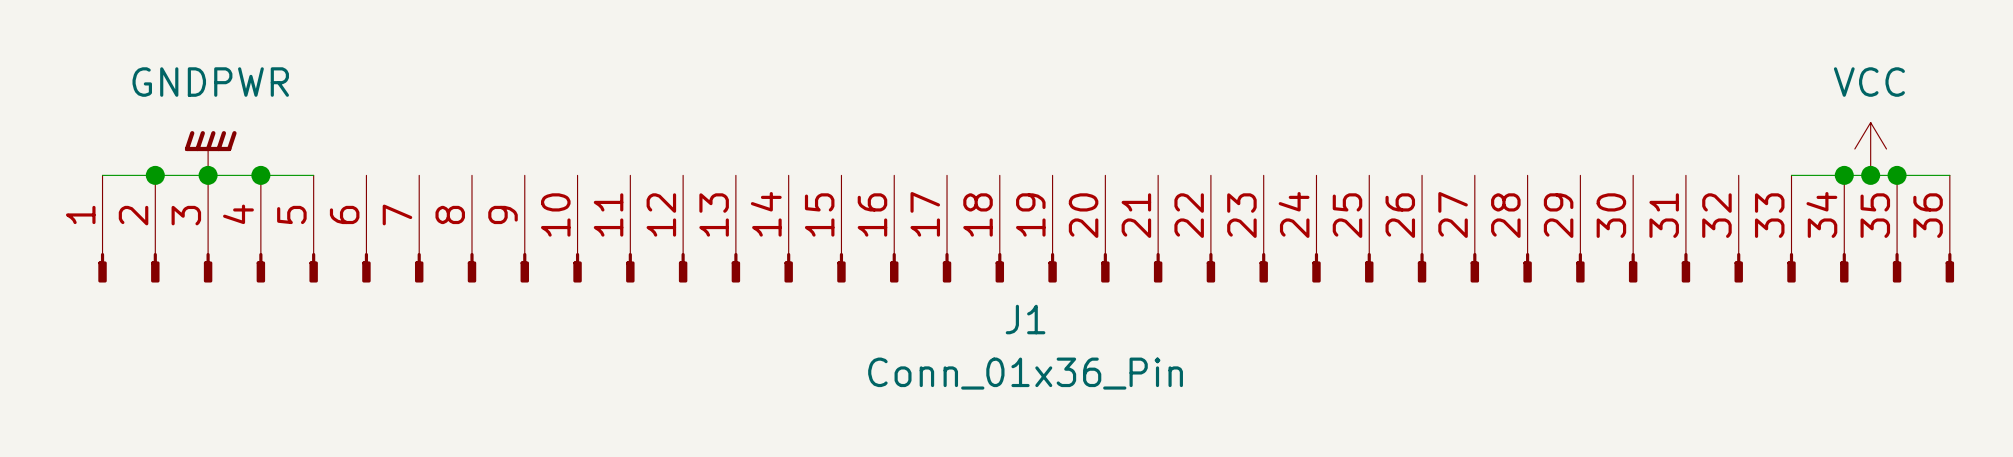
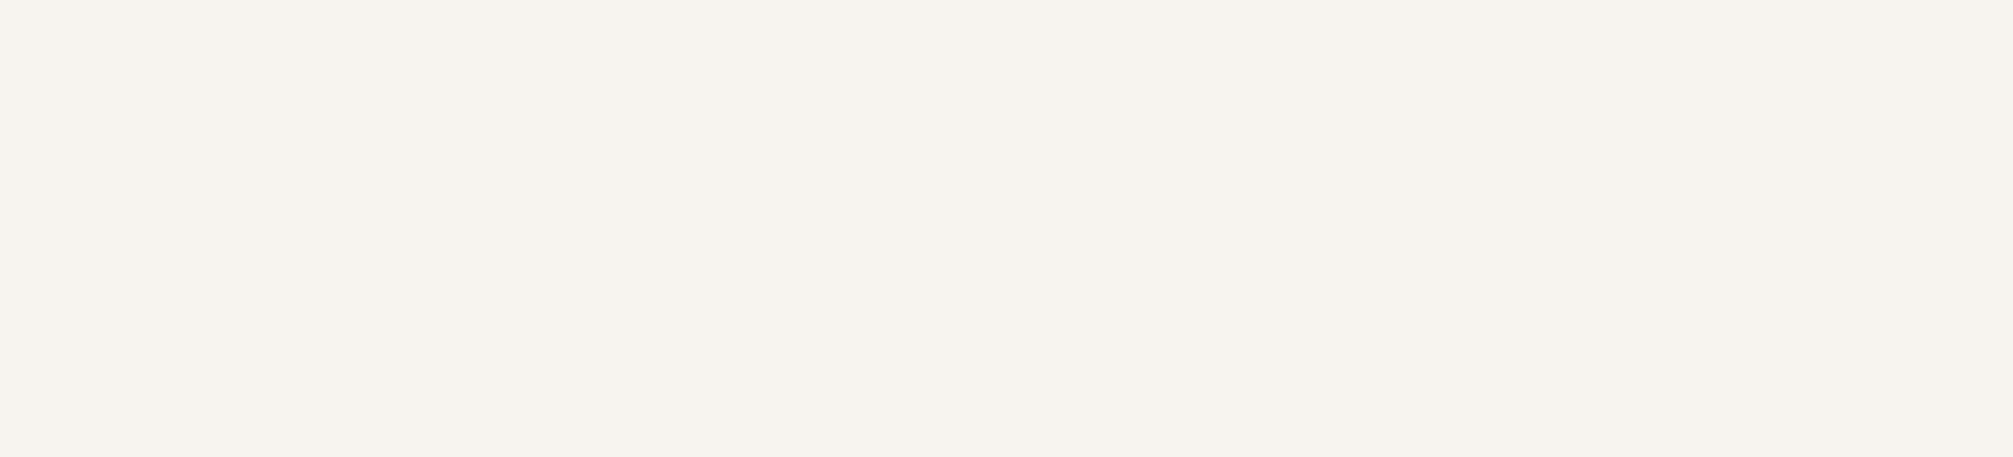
power symbol: VCC (1870, 148) -> none
power symbol: GNDPWR (210, 153) -> none
wire: (102, 175) (313, 175) -> none
junction: (155, 175) -> none
junction: (208, 175) -> none
junction: (260, 175) -> none
wire: (1791, 175) (1949, 175) -> none
junction: (1844, 175) -> none
junction: (1870, 175) -> none
junction: (1897, 175) -> none
J1: Conn_01x36_Pin (1026, 228) -> none

